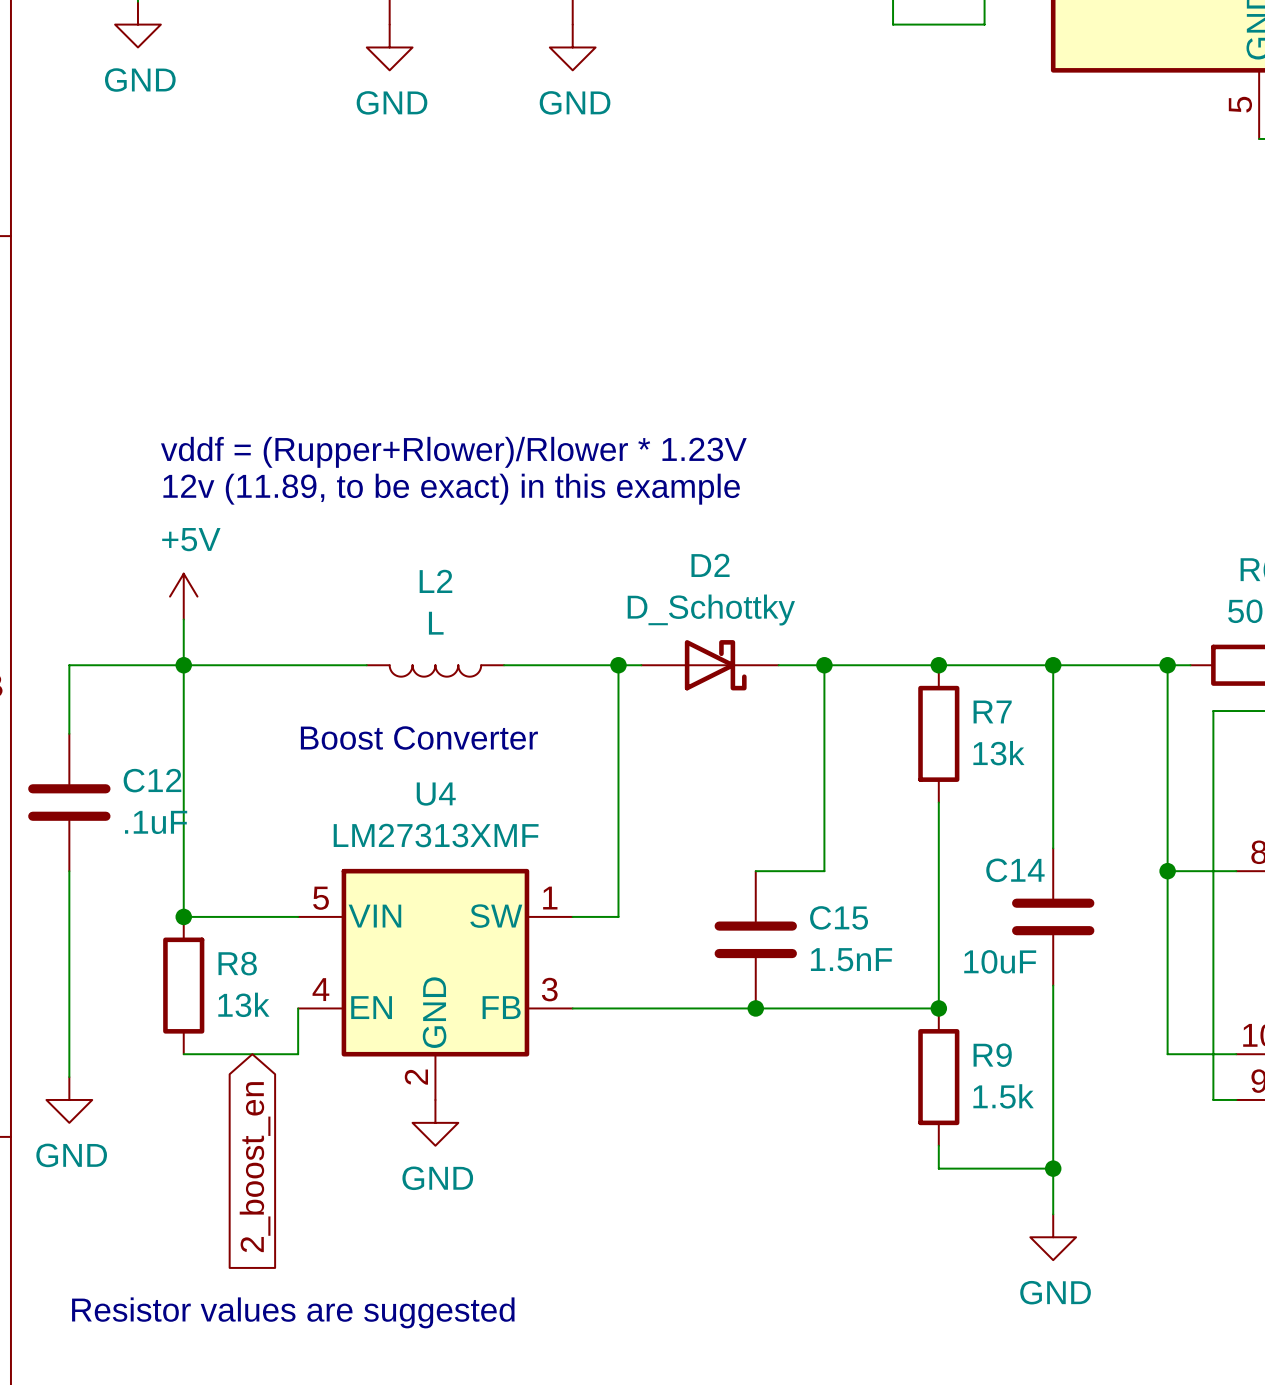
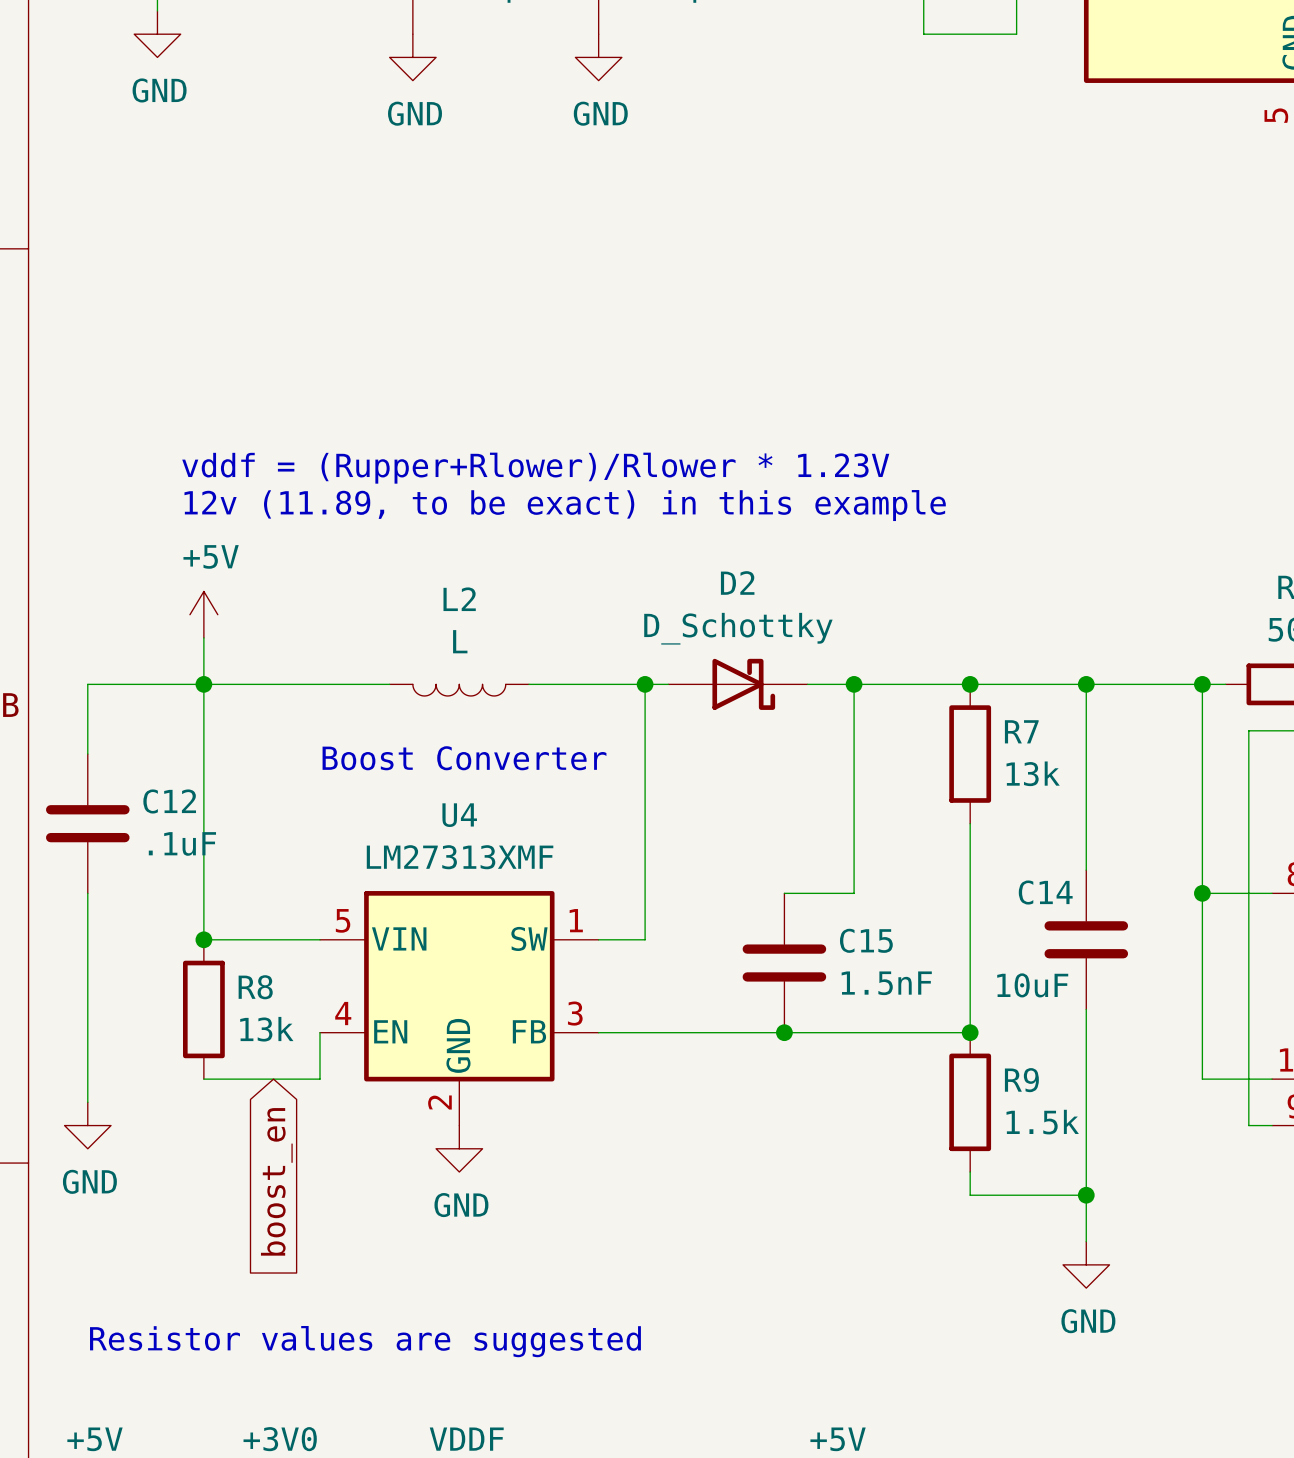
global label: 2_boost_en (255, 1167) -> boost_en (276, 1181)

